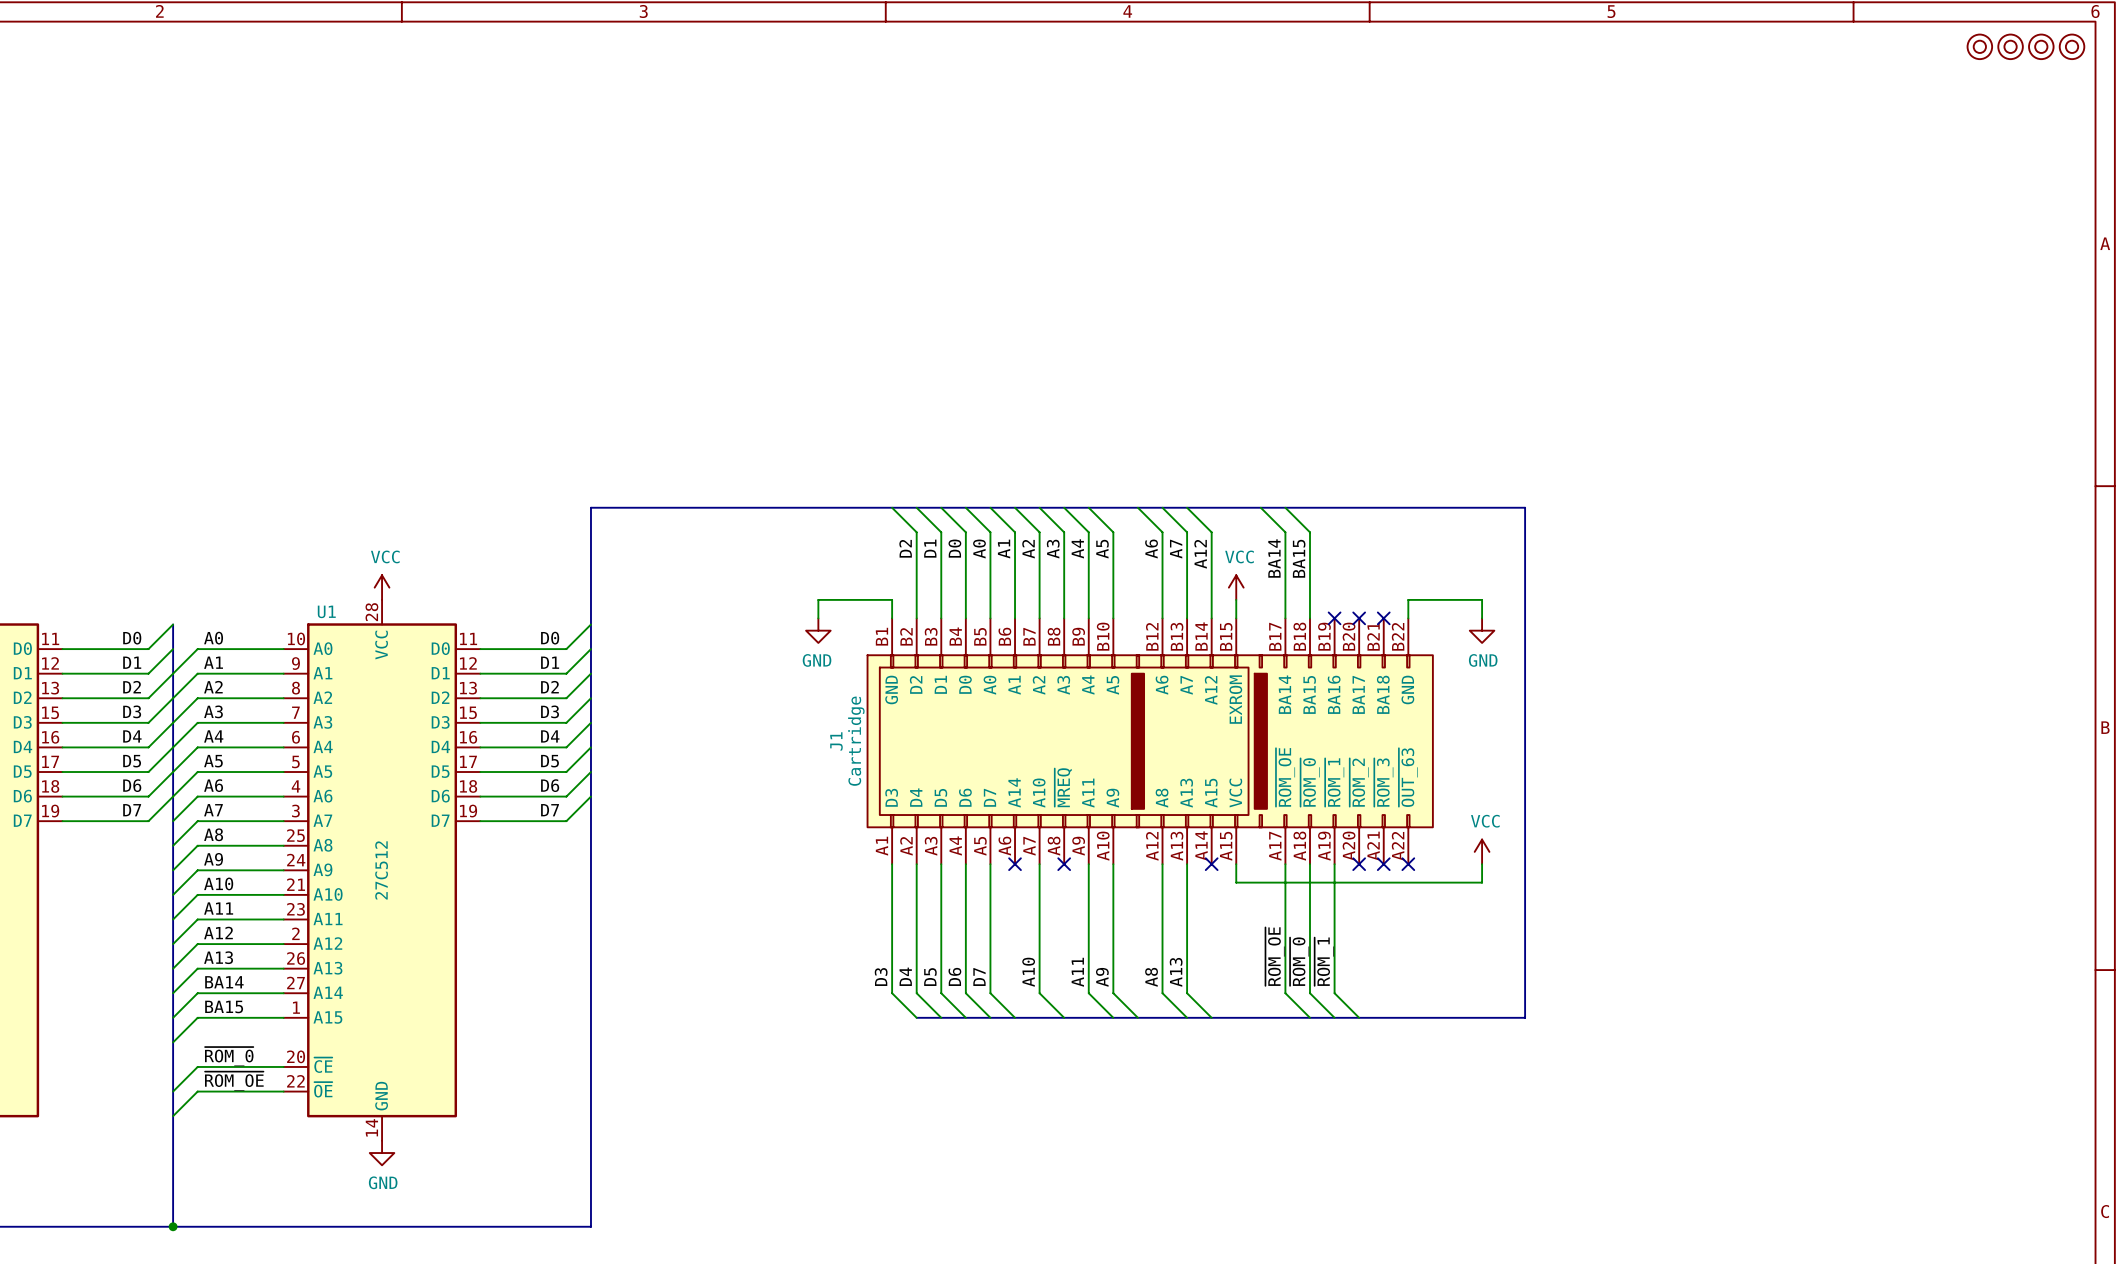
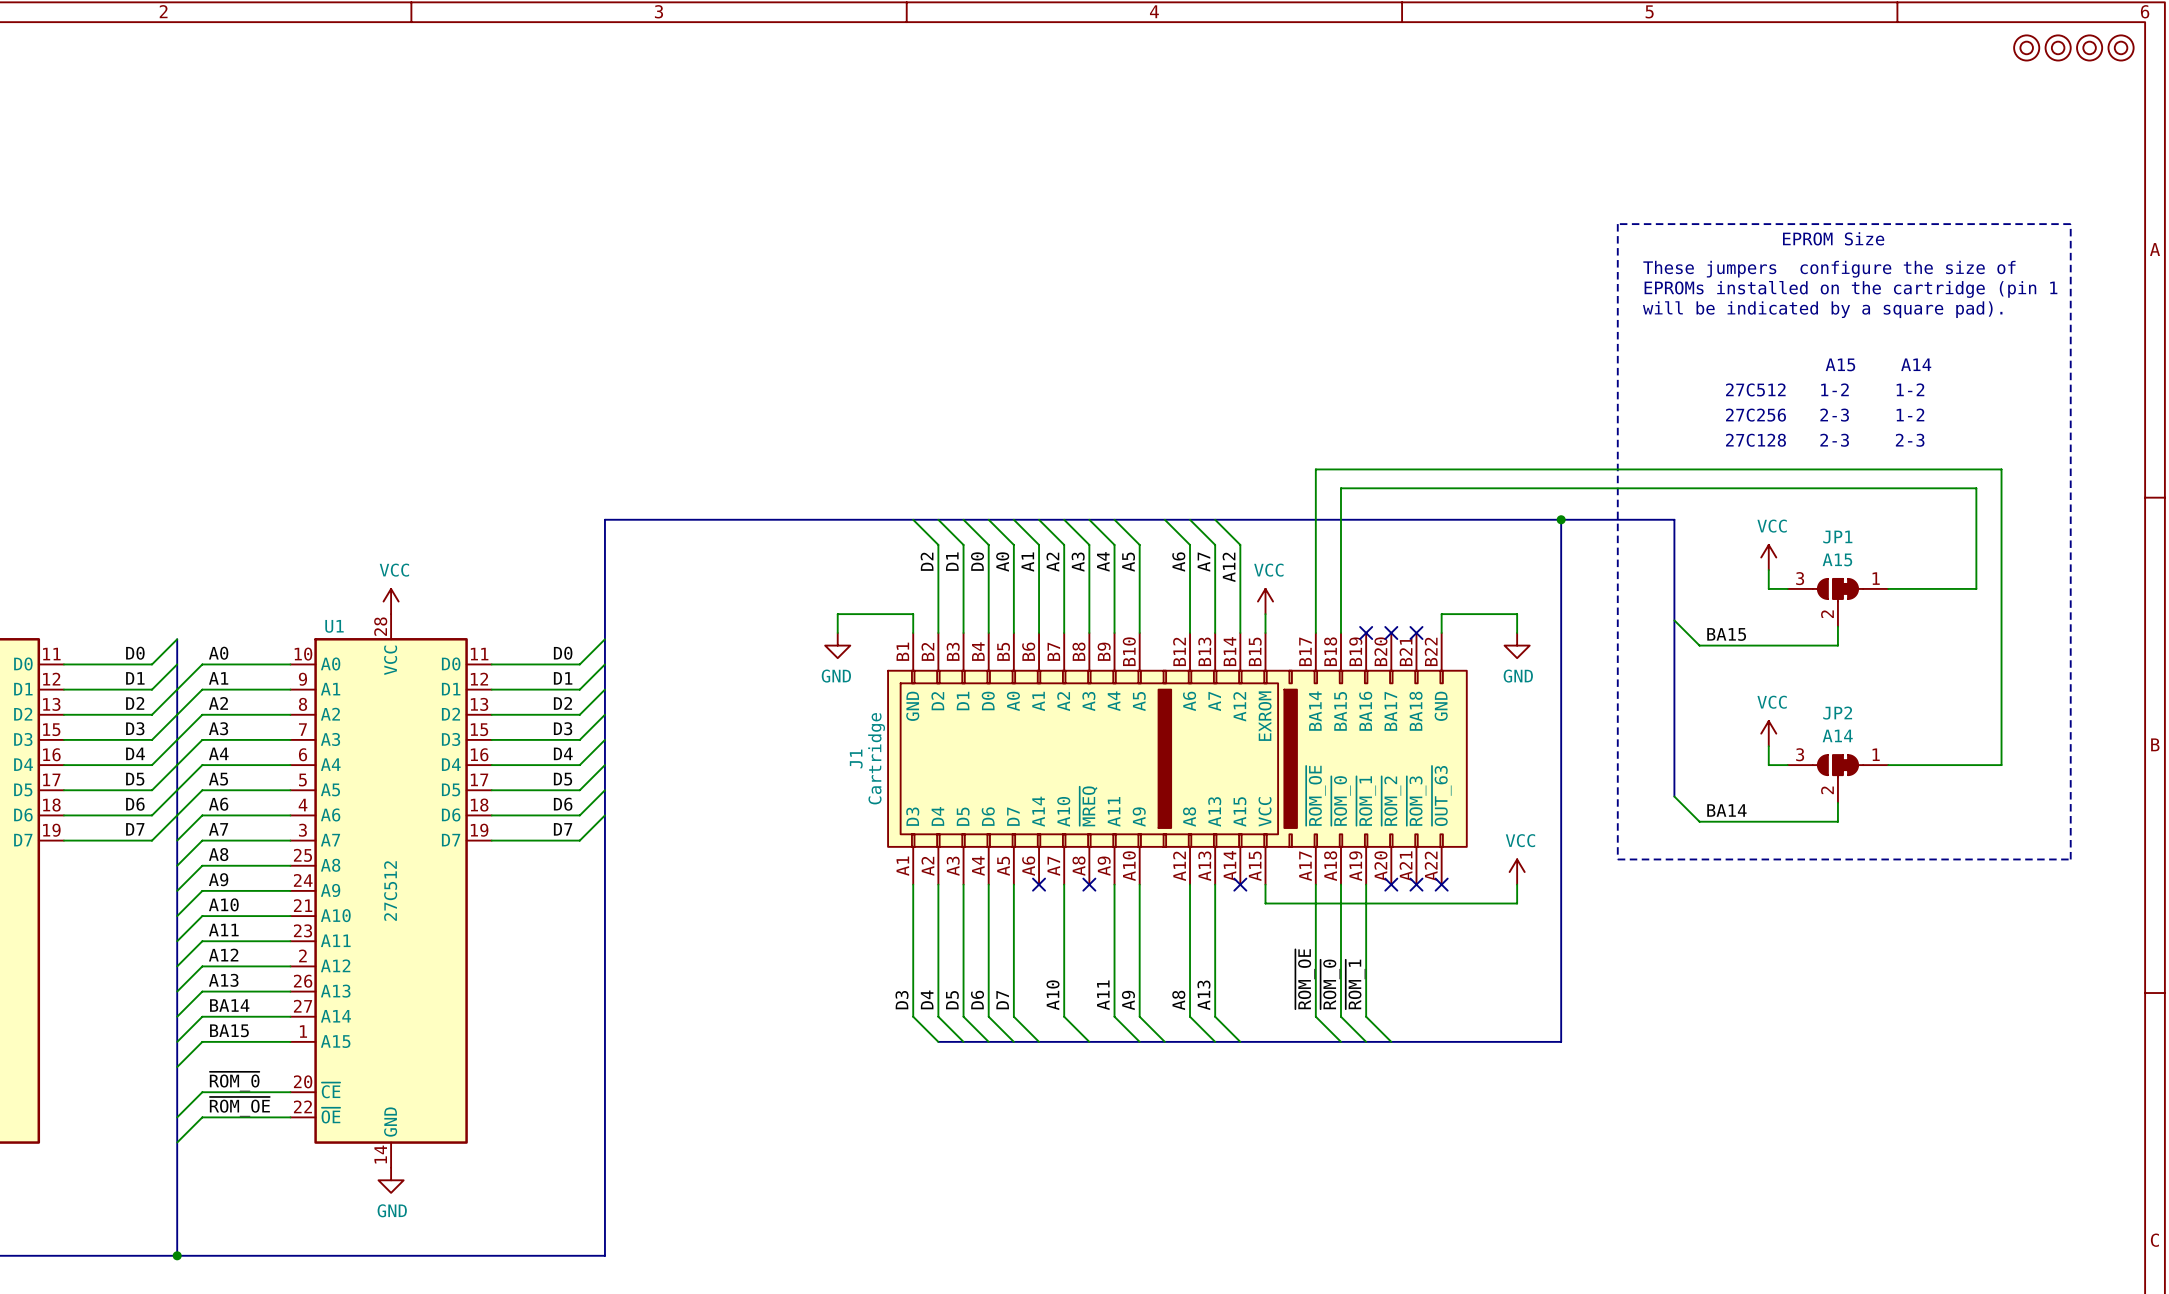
line: none -> (1617, 224) (2070, 224) (2070, 859) (1617, 859) (1617, 224)
text: none -> EPROM Size (1833, 238)
text: none -> These jumpers configure the size of (1829, 269)
text: none -> EPROMs installed on the cartridge (pin 1 (1850, 289)
text: none -> will be indicated by a square pad). (1822, 309)
text: none -> A15 (1840, 364)
text: none -> A14 (1916, 364)
text: none -> 27C512 (1755, 389)
text: none -> 1-2 (1834, 389)
text: none -> 1-2 (1910, 389)
text: none -> 27C256 (1755, 415)
text: none -> 2-3 (1834, 415)
text: none -> 1-2 (1910, 414)
text: none -> 27C128 (1755, 440)
text: none -> 2-3 (1834, 440)
text: none -> 2-3 (1910, 440)
wire: (1260, 507) (1285, 532) -> (1888, 765) (2001, 765) (2001, 469) (1315, 469) (1315, 544)
wire: (1285, 507) (1310, 532) -> (1888, 588) (1976, 588) (1976, 488) (1340, 488) (1340, 544)
bus: none -> (1561, 519) (1674, 519) (1674, 796)
junction: none -> (1561, 519)
power symbol: none -> VCC (1768, 557)
wire: none -> (1768, 570) (1768, 588) (1787, 588)
label: BA14 (1274, 558) -> none
label: BA15 (1299, 558) -> none
JP1: none -> A15 (1837, 602)
wire: none -> (1674, 620) (1699, 645) (1837, 645) (1837, 626)
label: none -> BA15 (1726, 634)
power symbol: none -> VCC (1768, 733)
wire: none -> (1768, 746) (1768, 765) (1787, 765)
JP2: none -> A14 (1837, 778)
wire: none -> (1674, 796) (1699, 821) (1837, 821) (1837, 802)
label: none -> BA14 (1726, 810)

